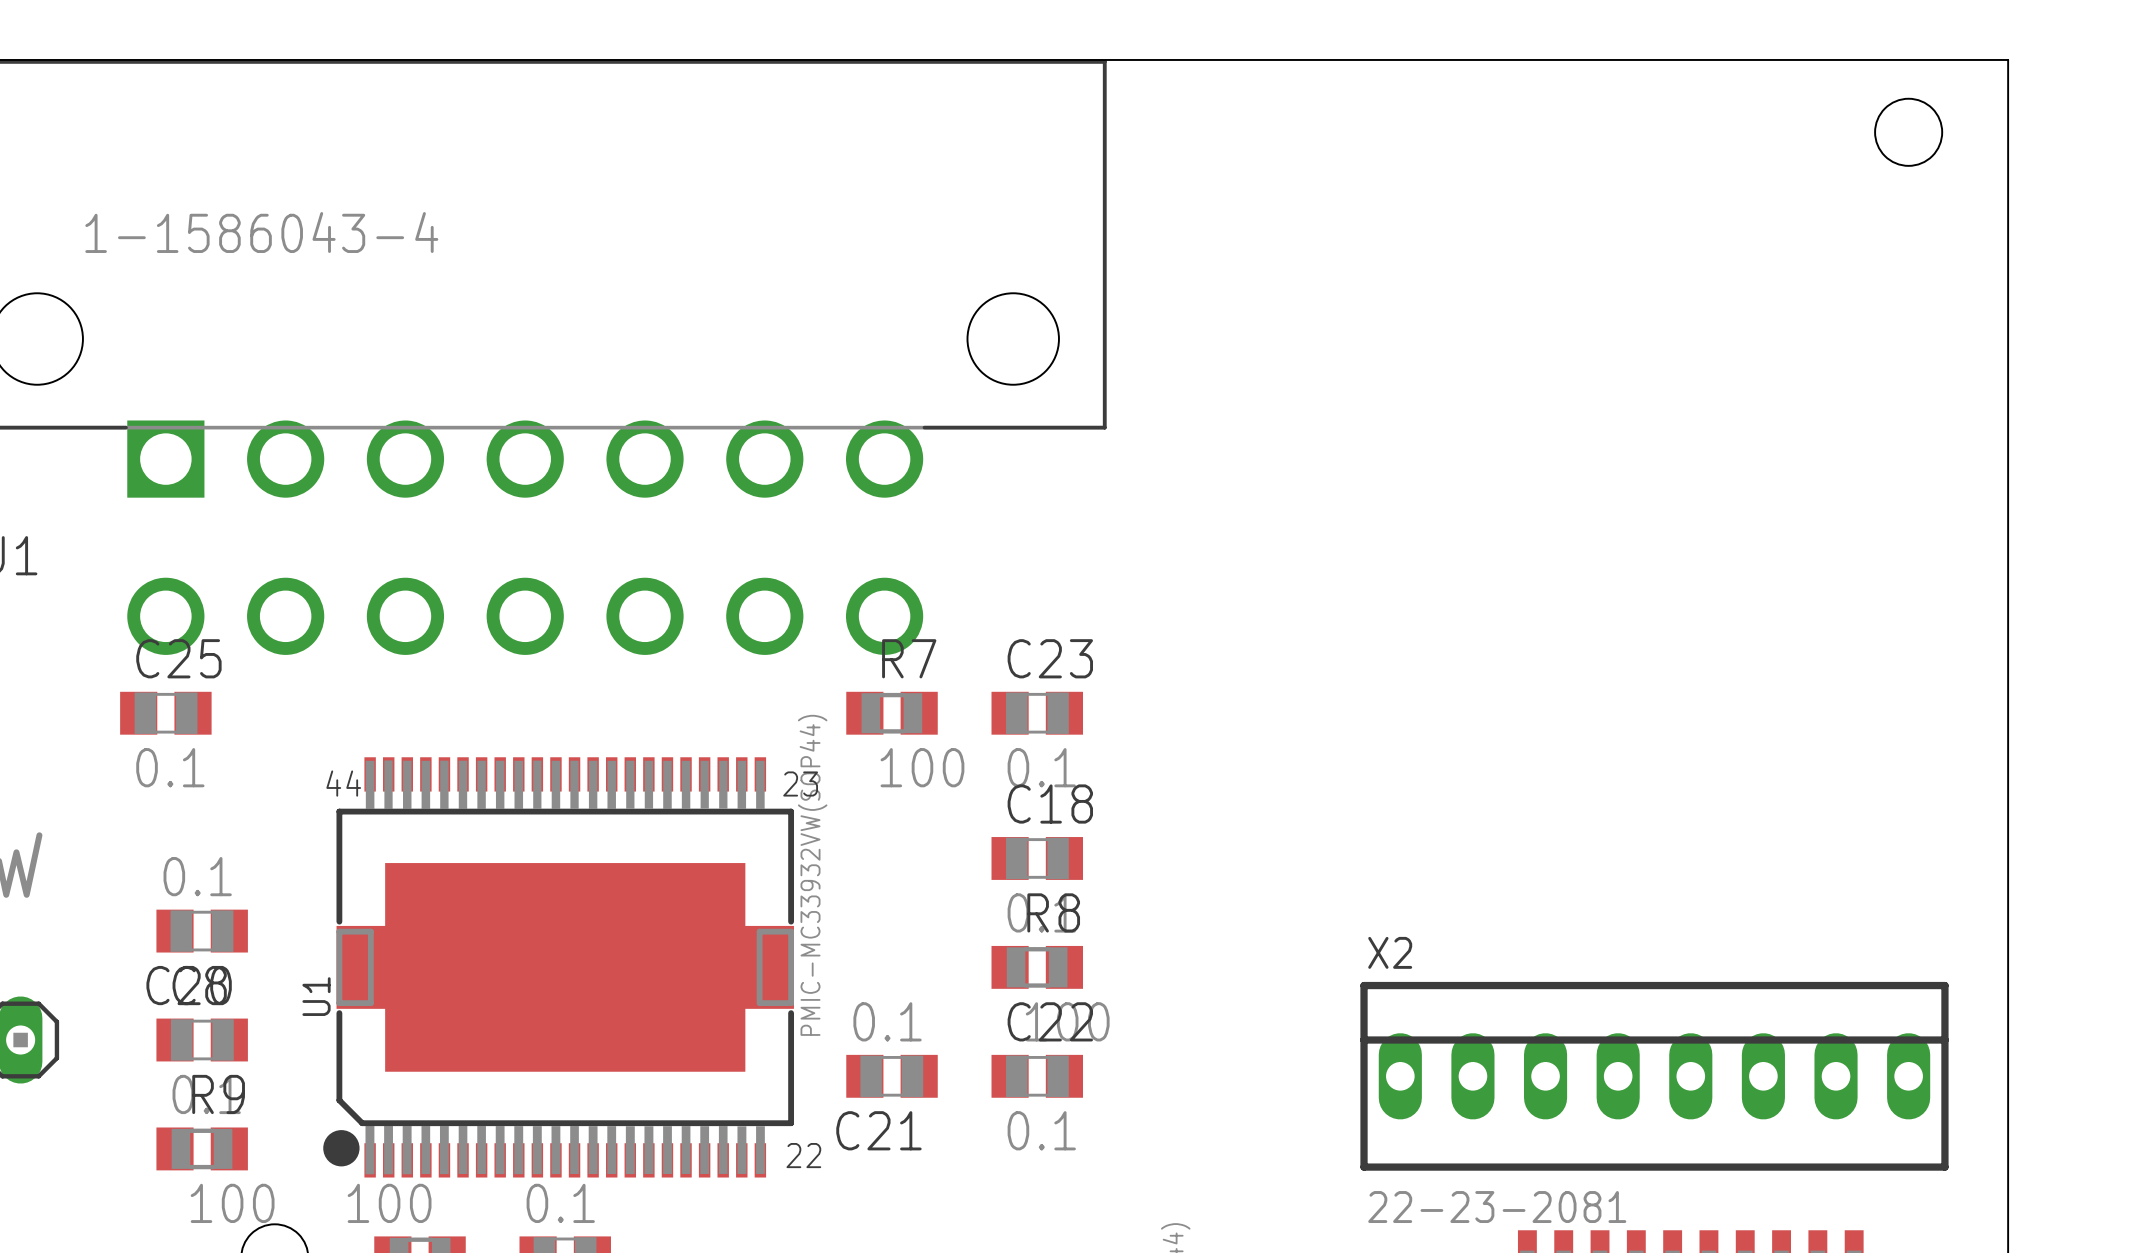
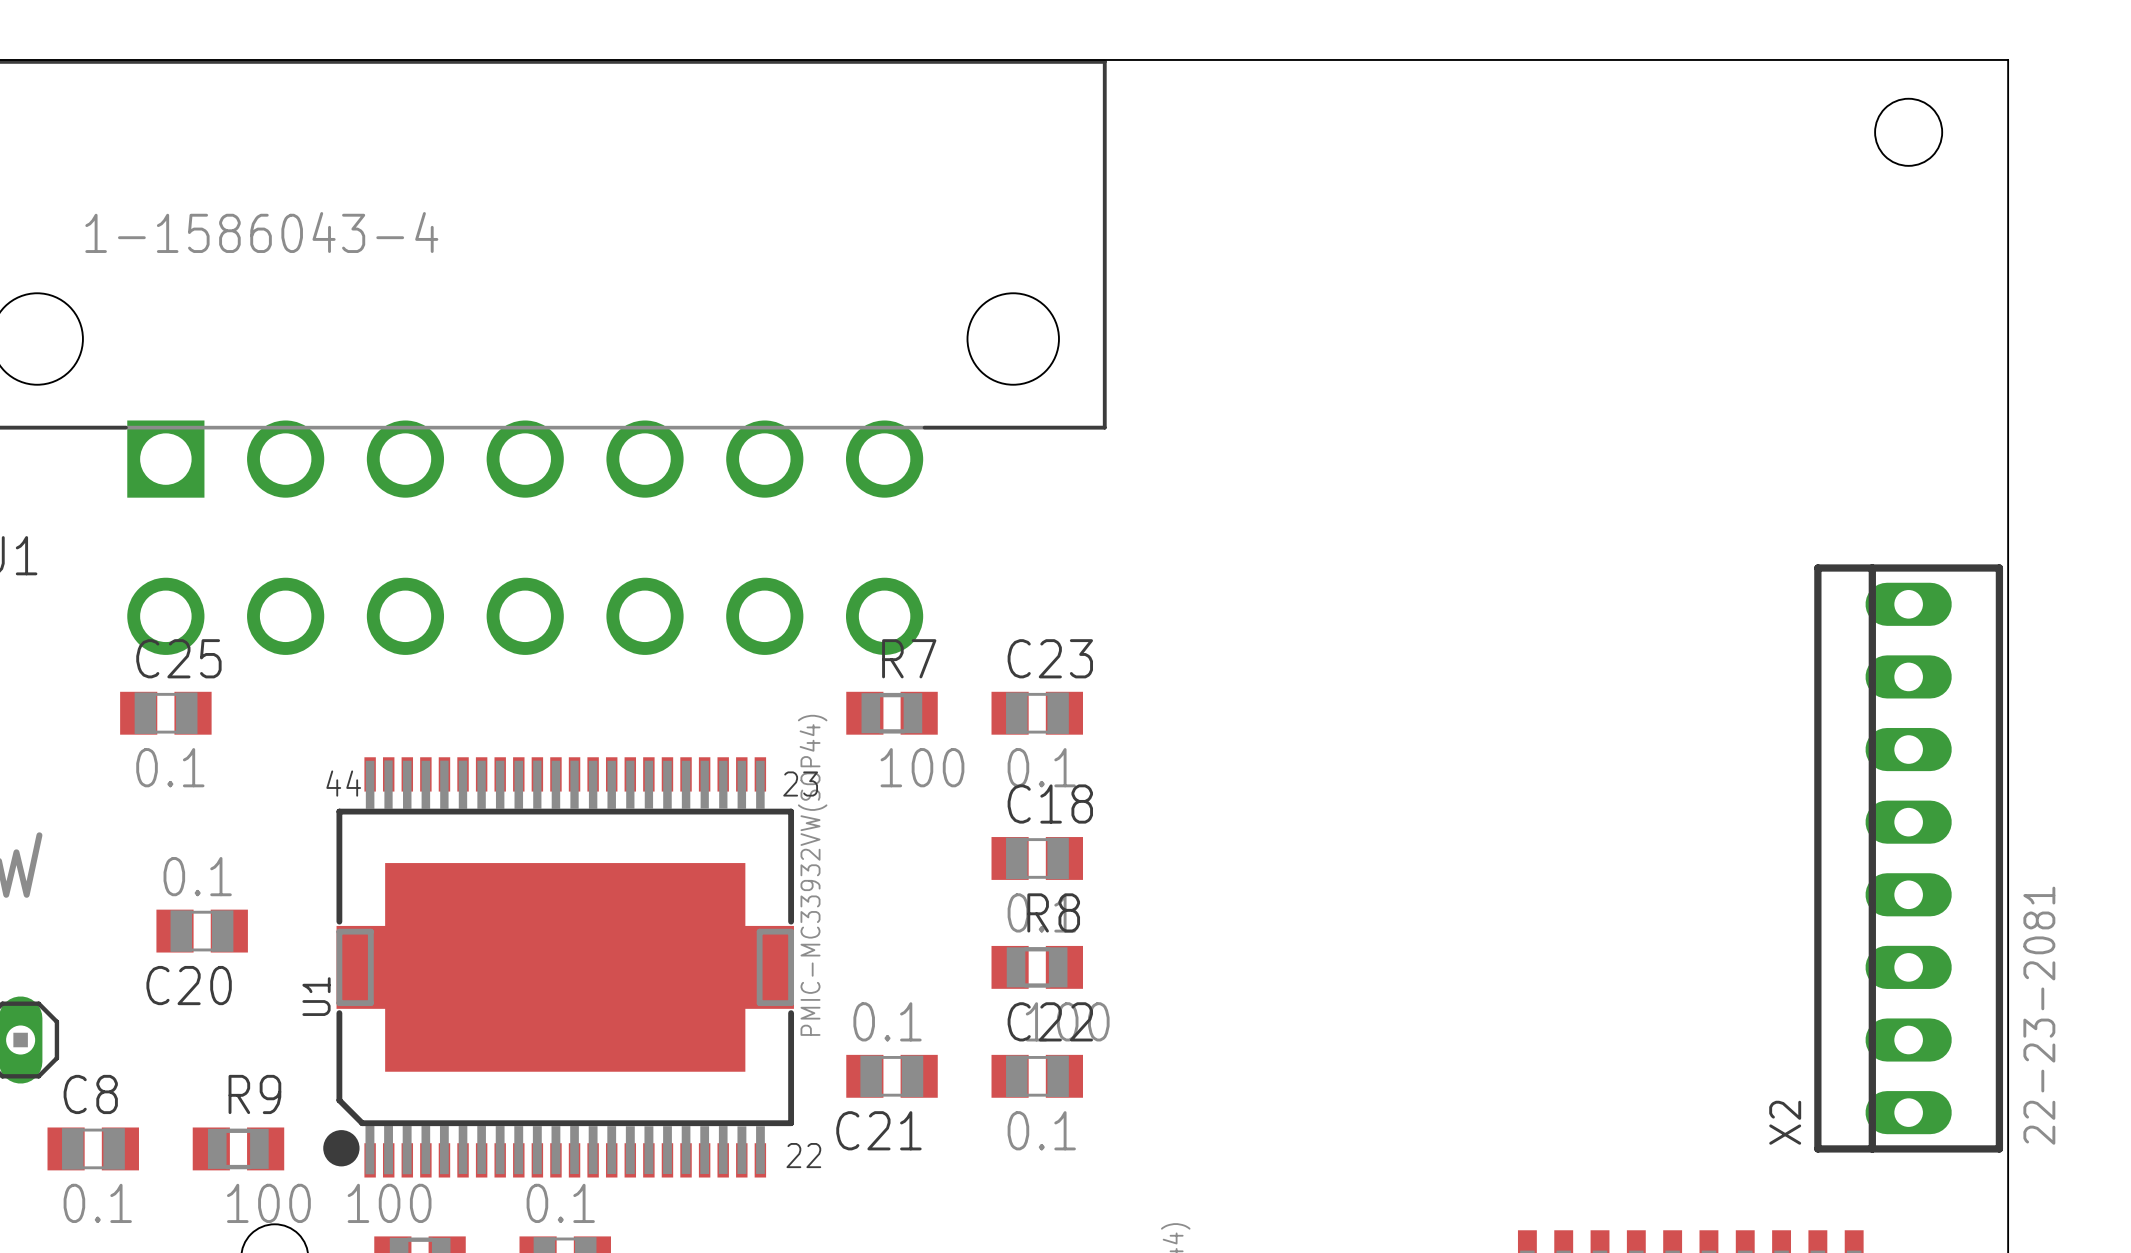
C8 position: (202, 1040) -> (93, 1148)
X2 rotation: 0° (1654, 1076) -> 90° counterclockwise (1908, 858)
R9 position: (202, 1148) -> (238, 1148)

